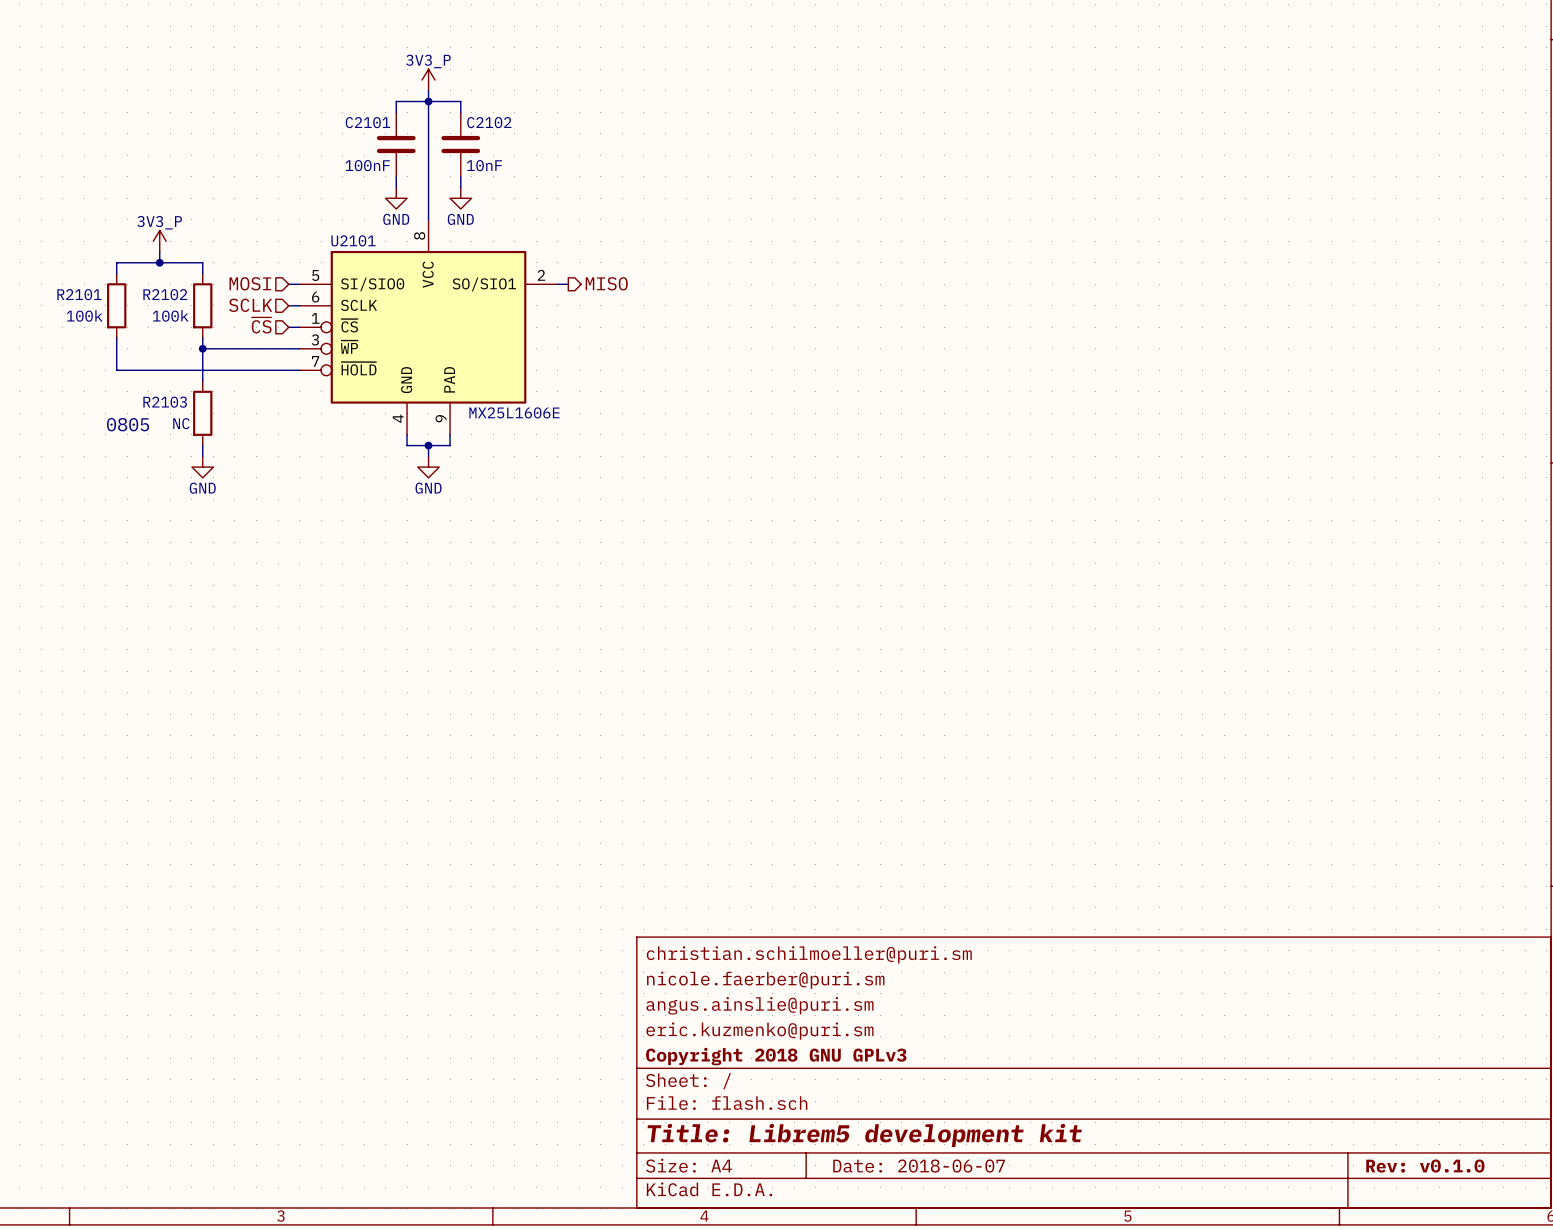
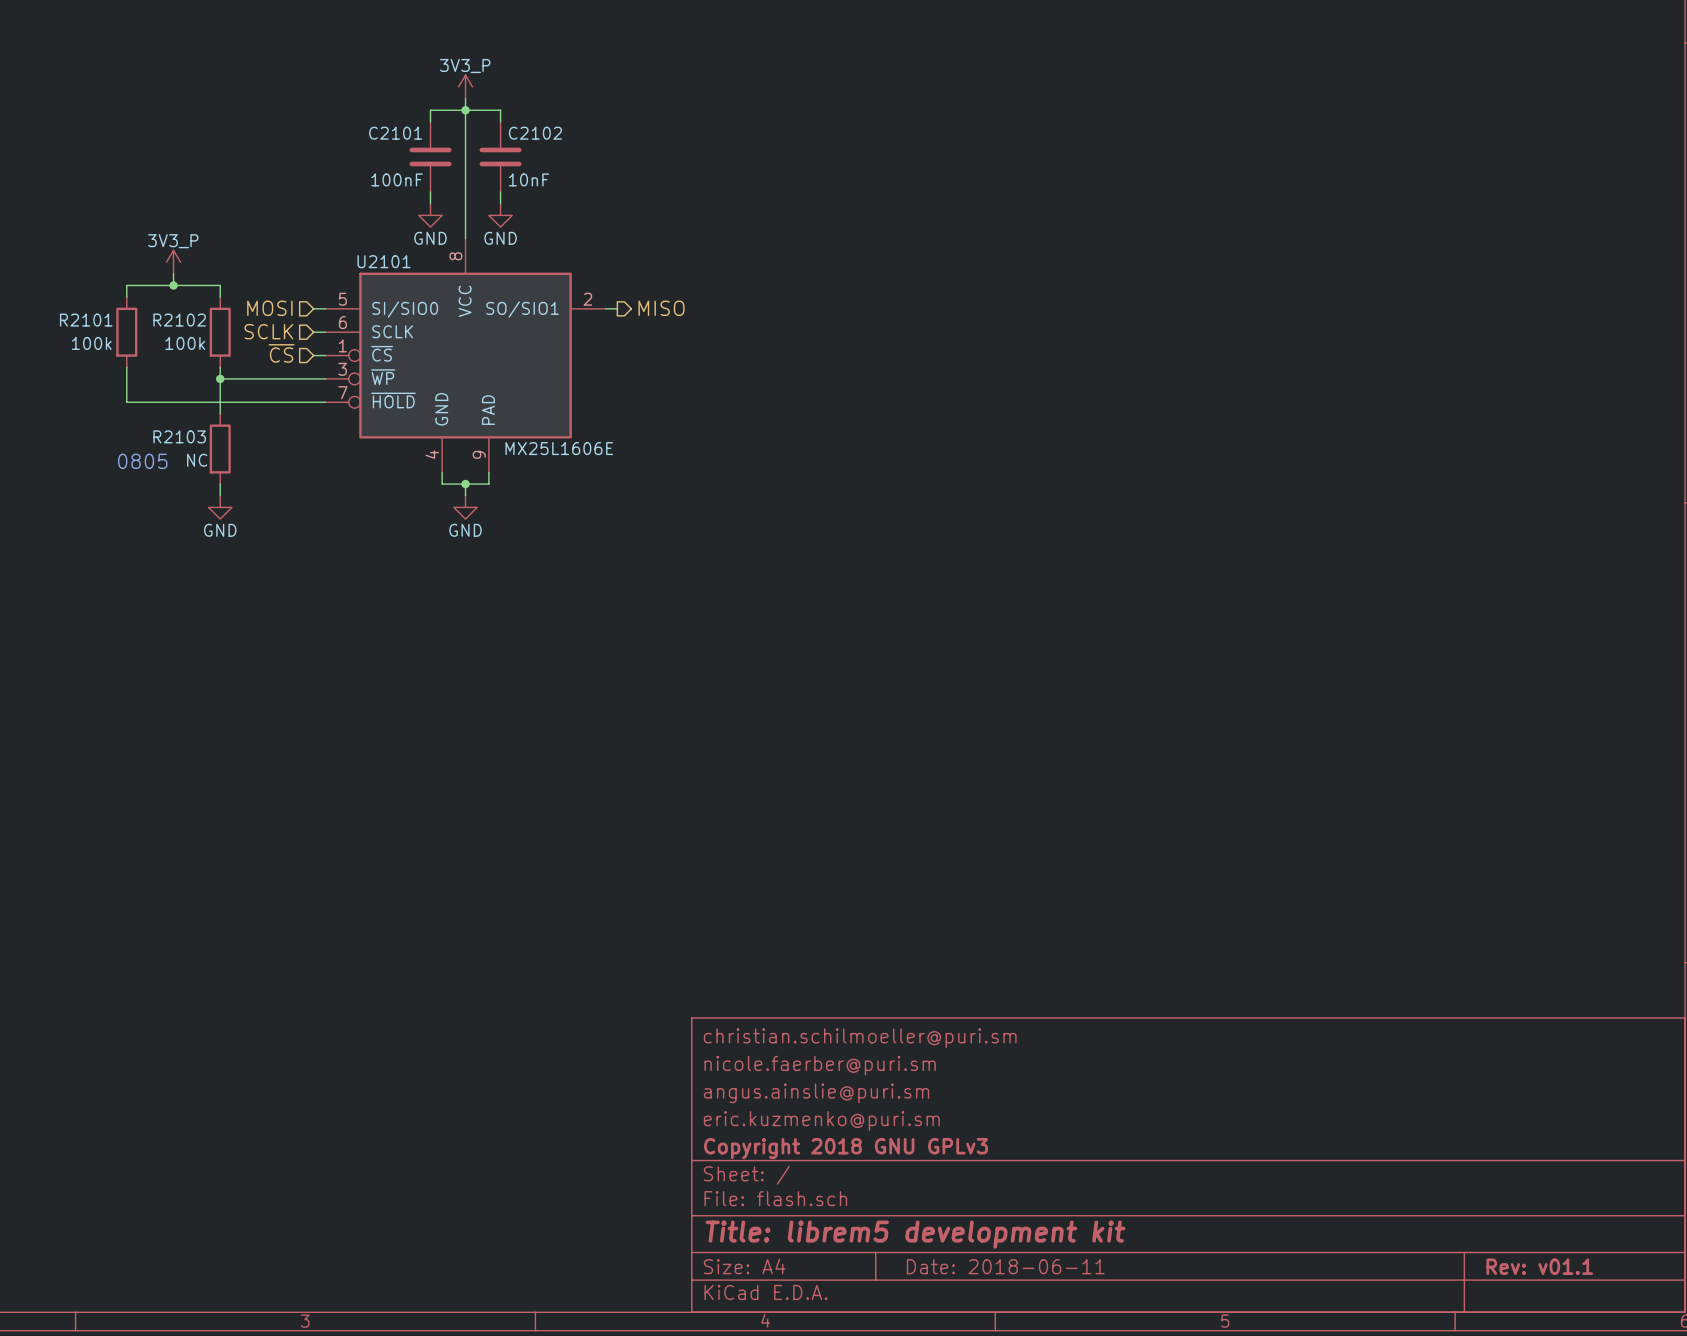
title block: Title: Librem5 development kit (864, 1135) -> Title: librem5 development kit (915, 1234)
title block: Date: 2018-06-07 (919, 1166) -> Date: 2018-06-11 (1005, 1266)
title block: Rev: v0.1.0 (1425, 1166) -> Rev: v01.1 (1539, 1266)

